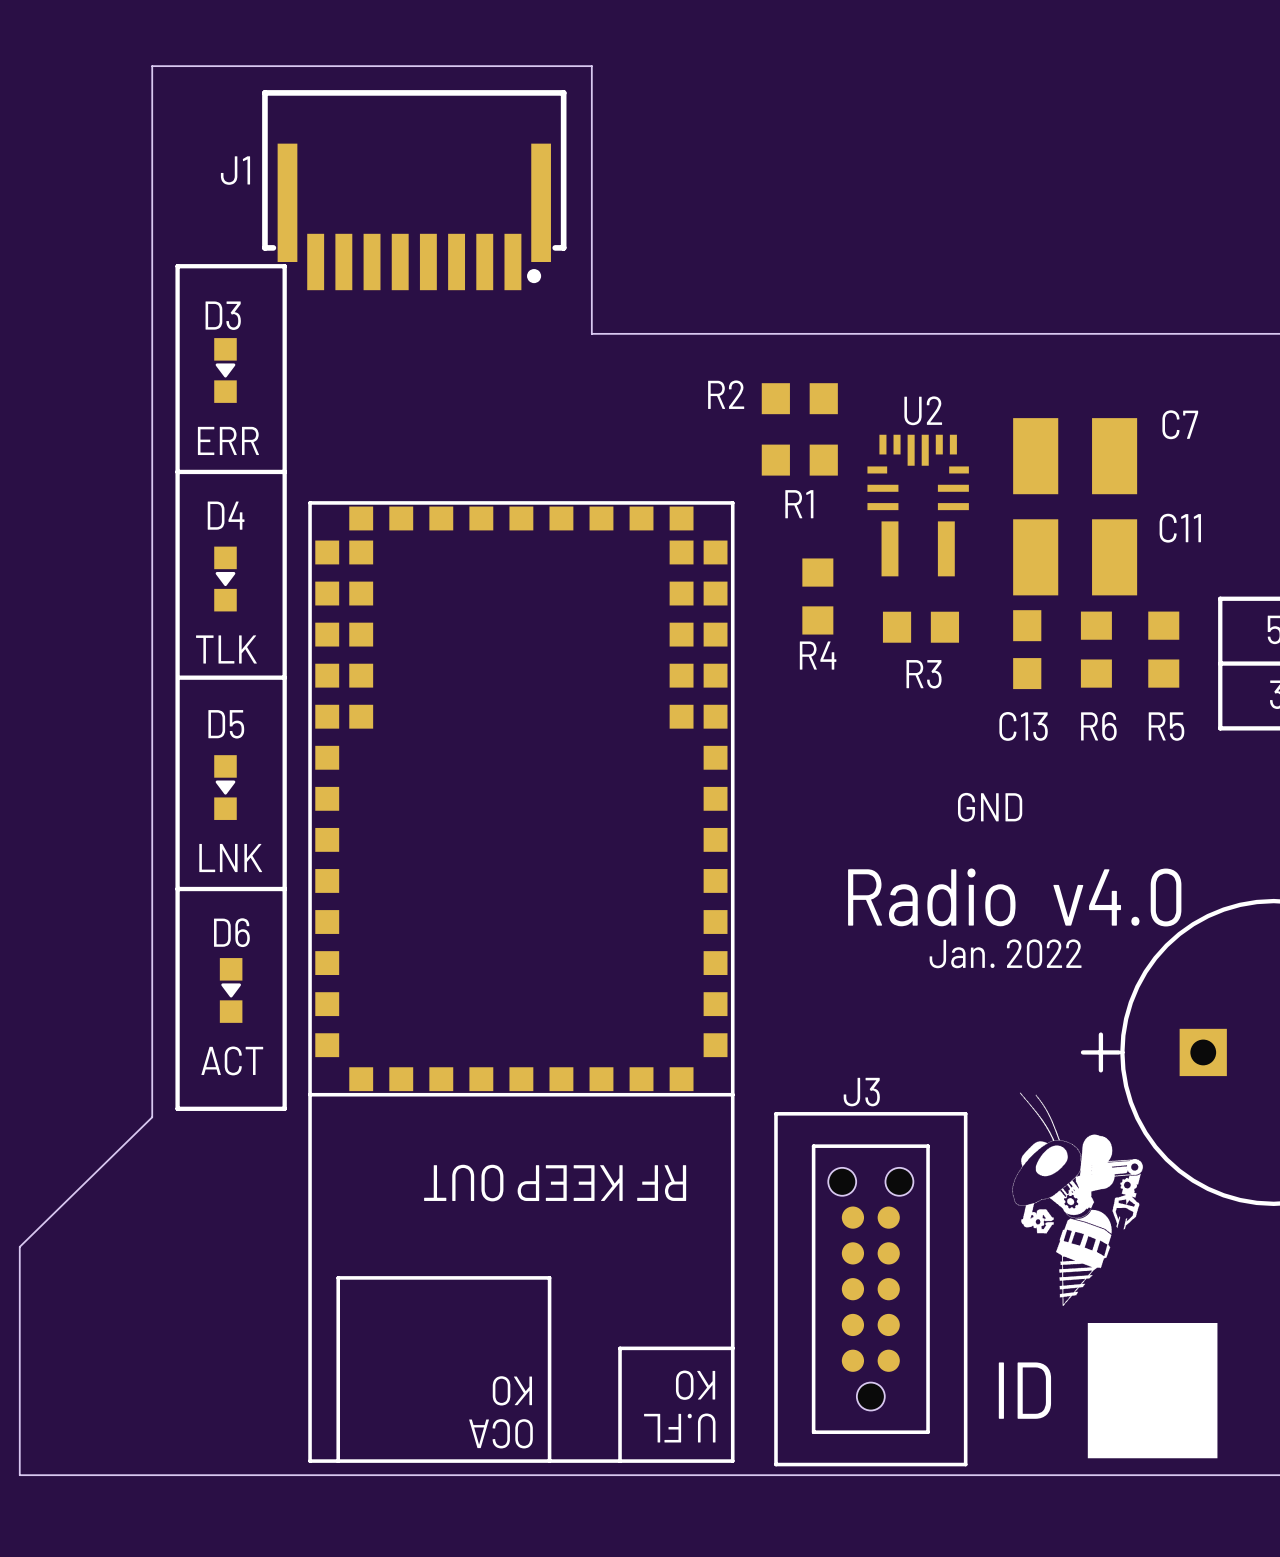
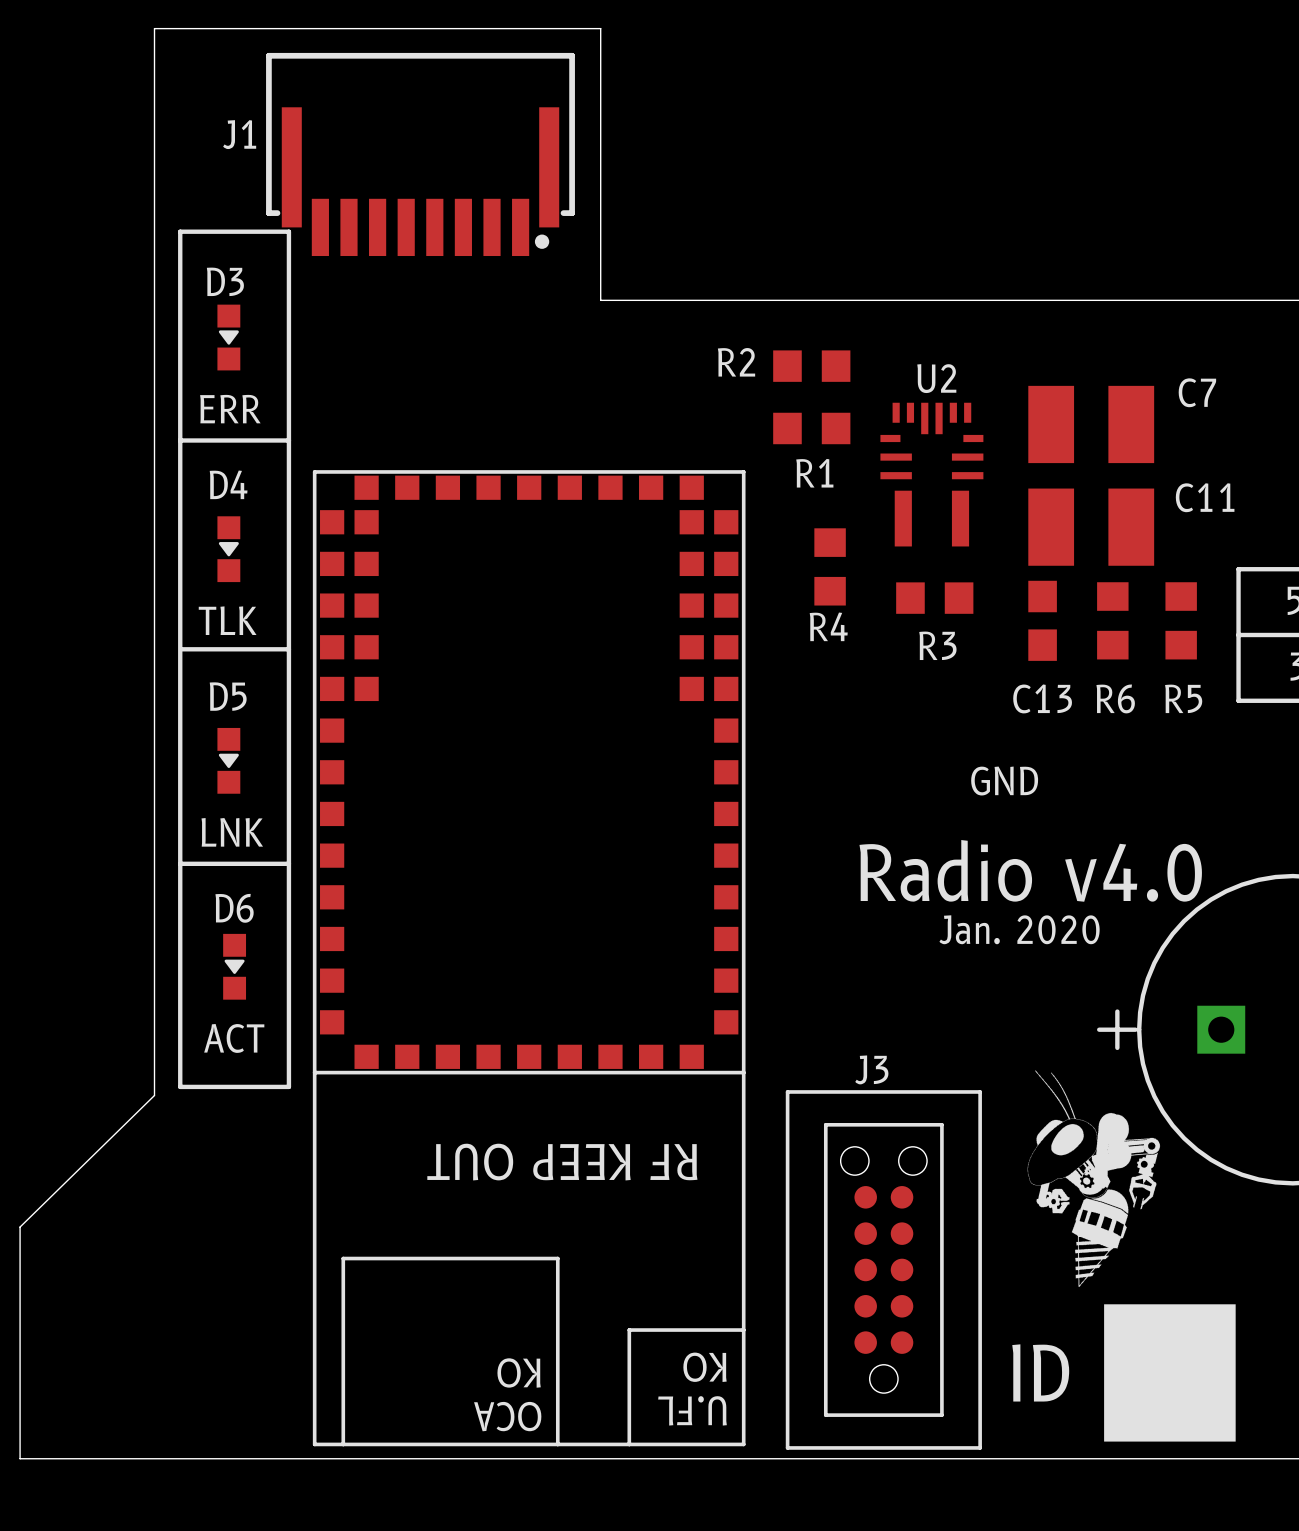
text: Jan. 2022 (1005, 953) -> Jan. 2020 (1019, 929)

